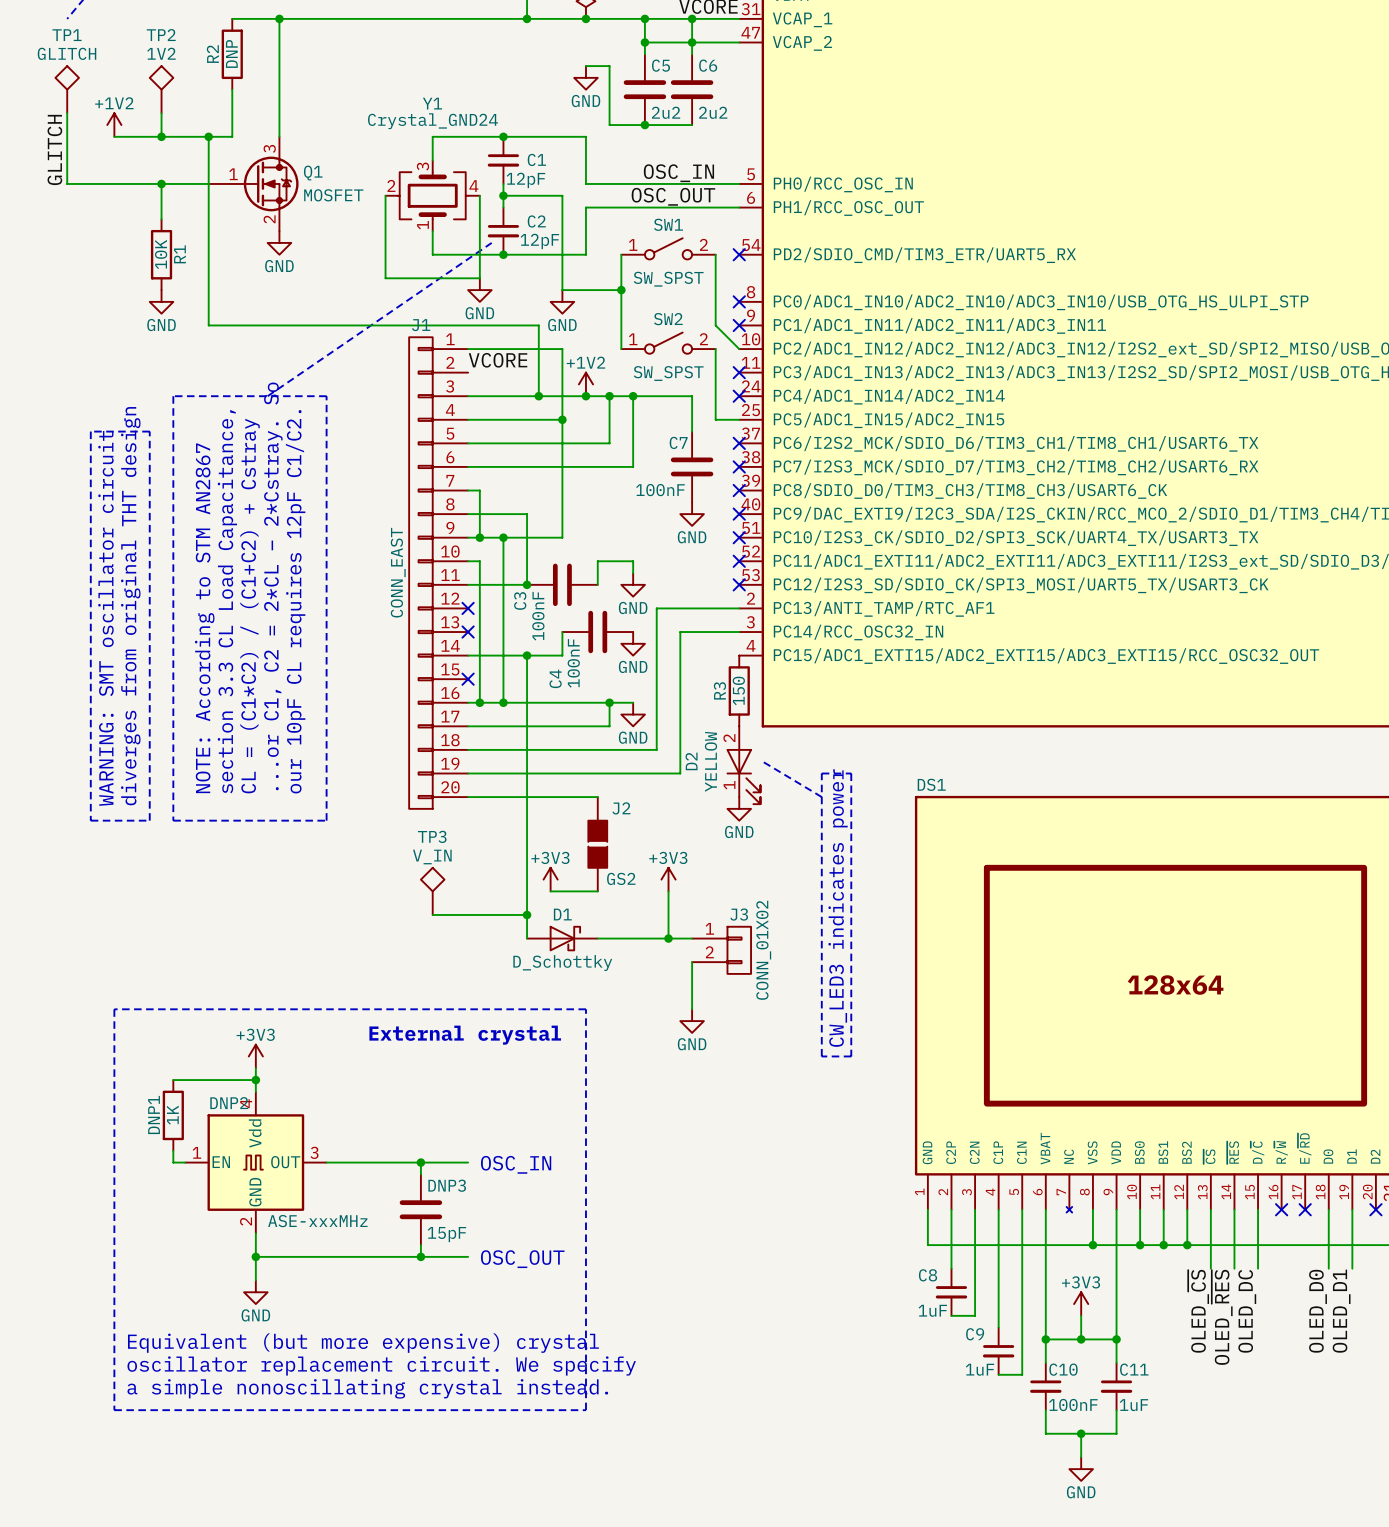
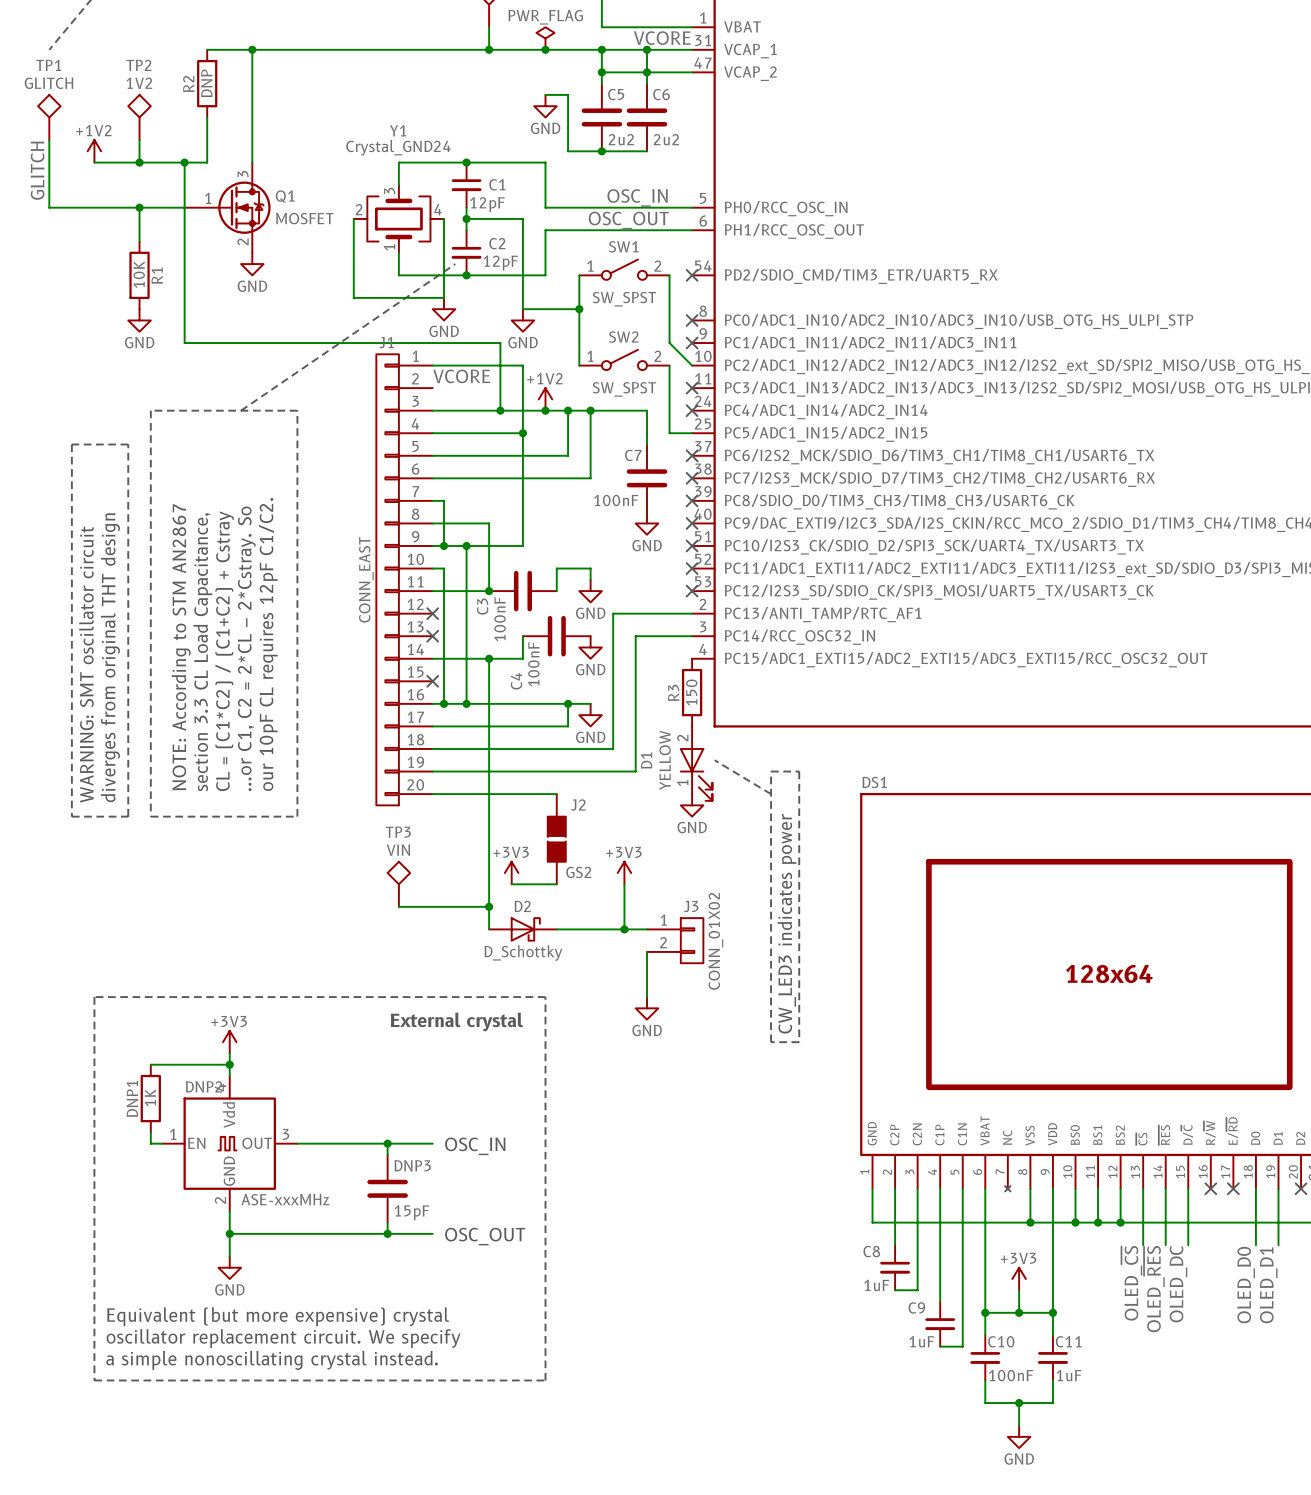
D2 name: D2 (691, 761) -> D1 (646, 760)
TP3 value: V_IN (432, 857) -> VIN (398, 850)
D1 name: D1 (562, 914) -> D2 (522, 906)

